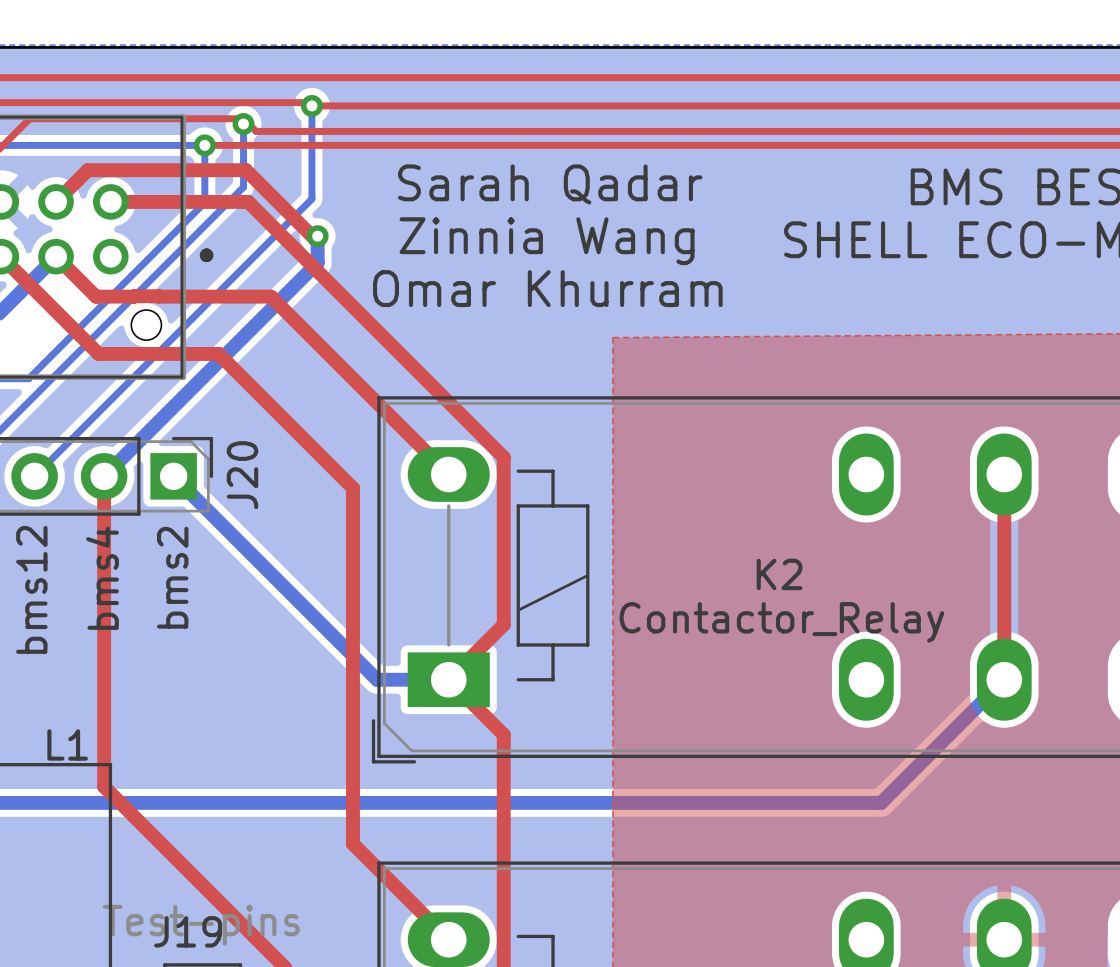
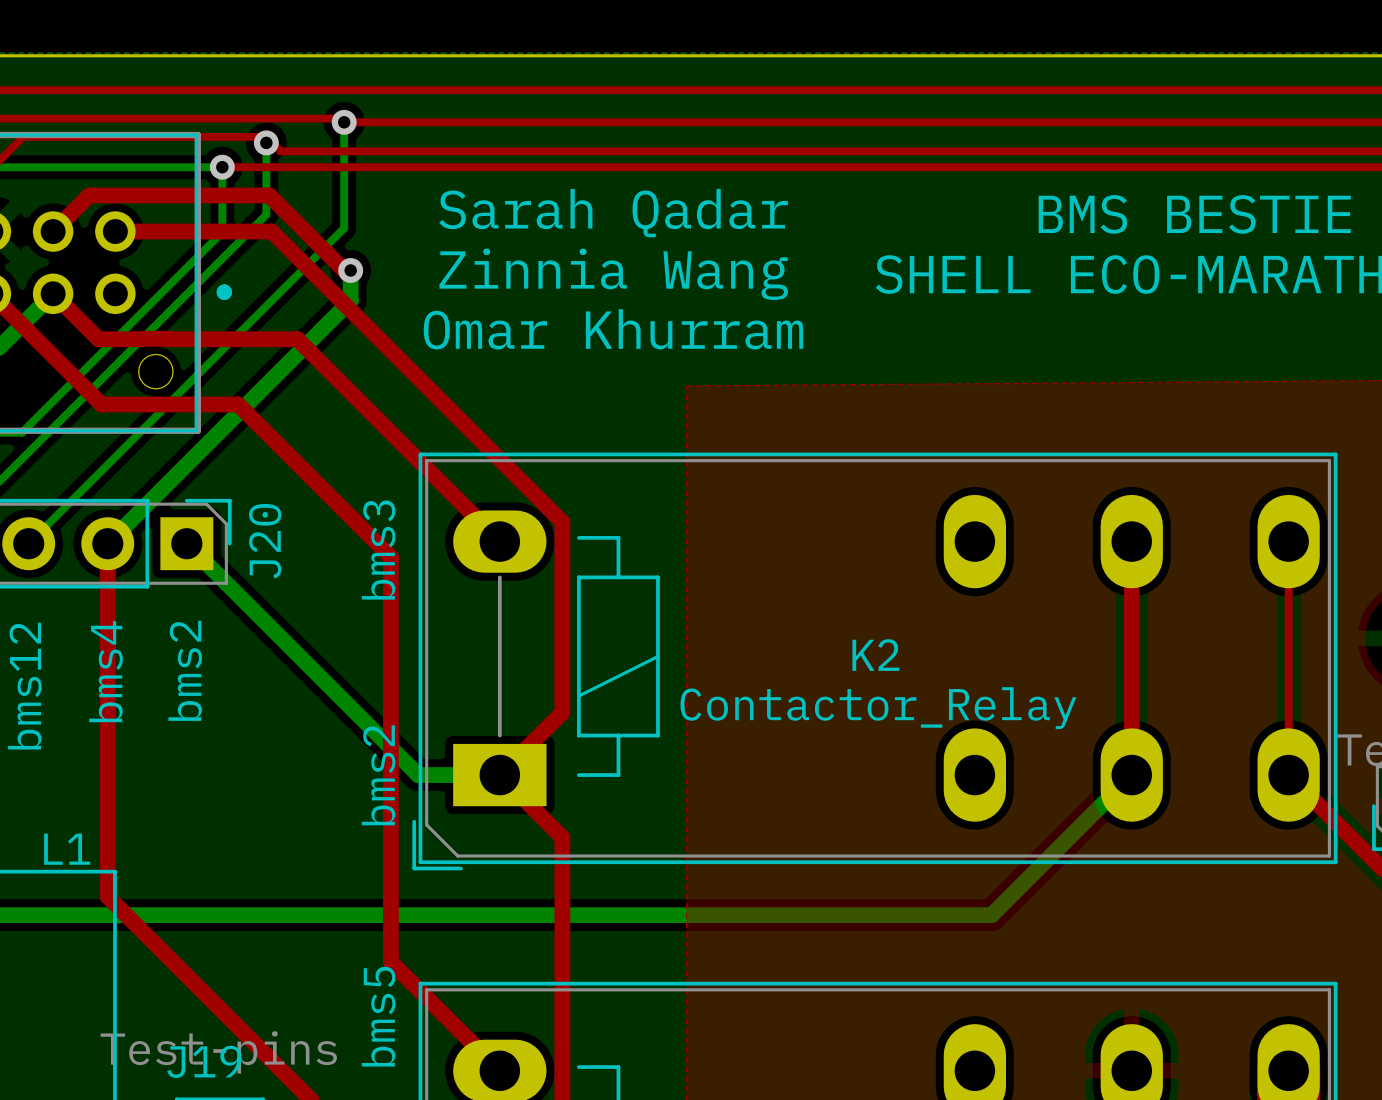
text: none -> bms3 (378, 550)
text: none -> bms2 (378, 775)
text: none -> bms5 (378, 1016)

